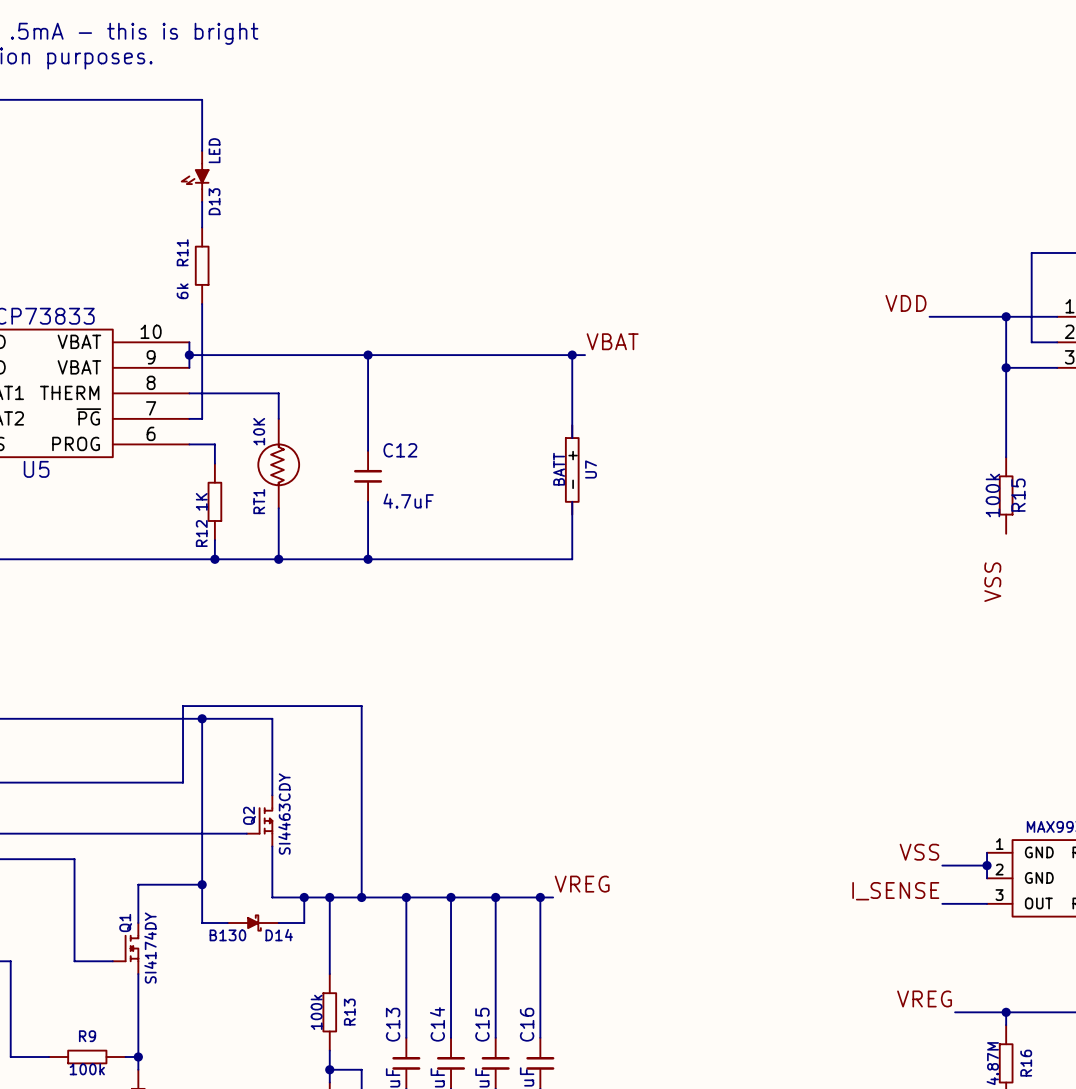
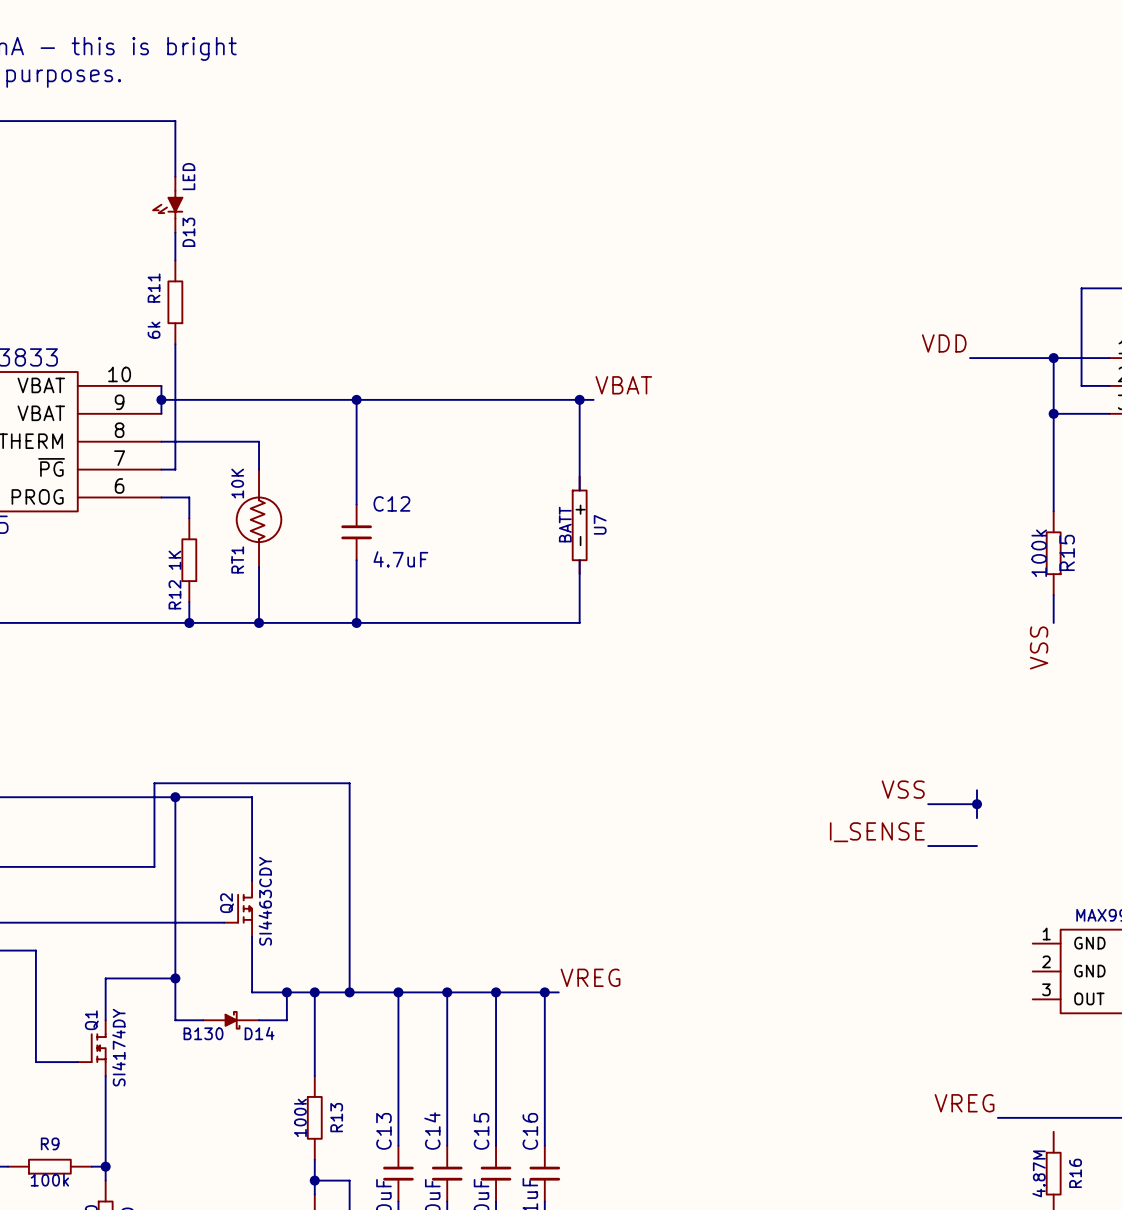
wire: none -> (1053, 595) (1053, 622)
junction: none -> (976, 804)
label position: VSS (919, 852) -> VSS (903, 789)
wire: (987, 852) (987, 878) -> (976, 790) (976, 818)
wire: (942, 865) (987, 865) -> (928, 804) (976, 804)
junction: (987, 865) -> none
label position: I_SENSE (895, 891) -> I_SENSE (877, 832)
wire: (942, 903) (987, 903) -> (928, 846) (976, 846)
wire: (1006, 1012) (1006, 1025) -> none
junction: (1006, 1012) -> none

